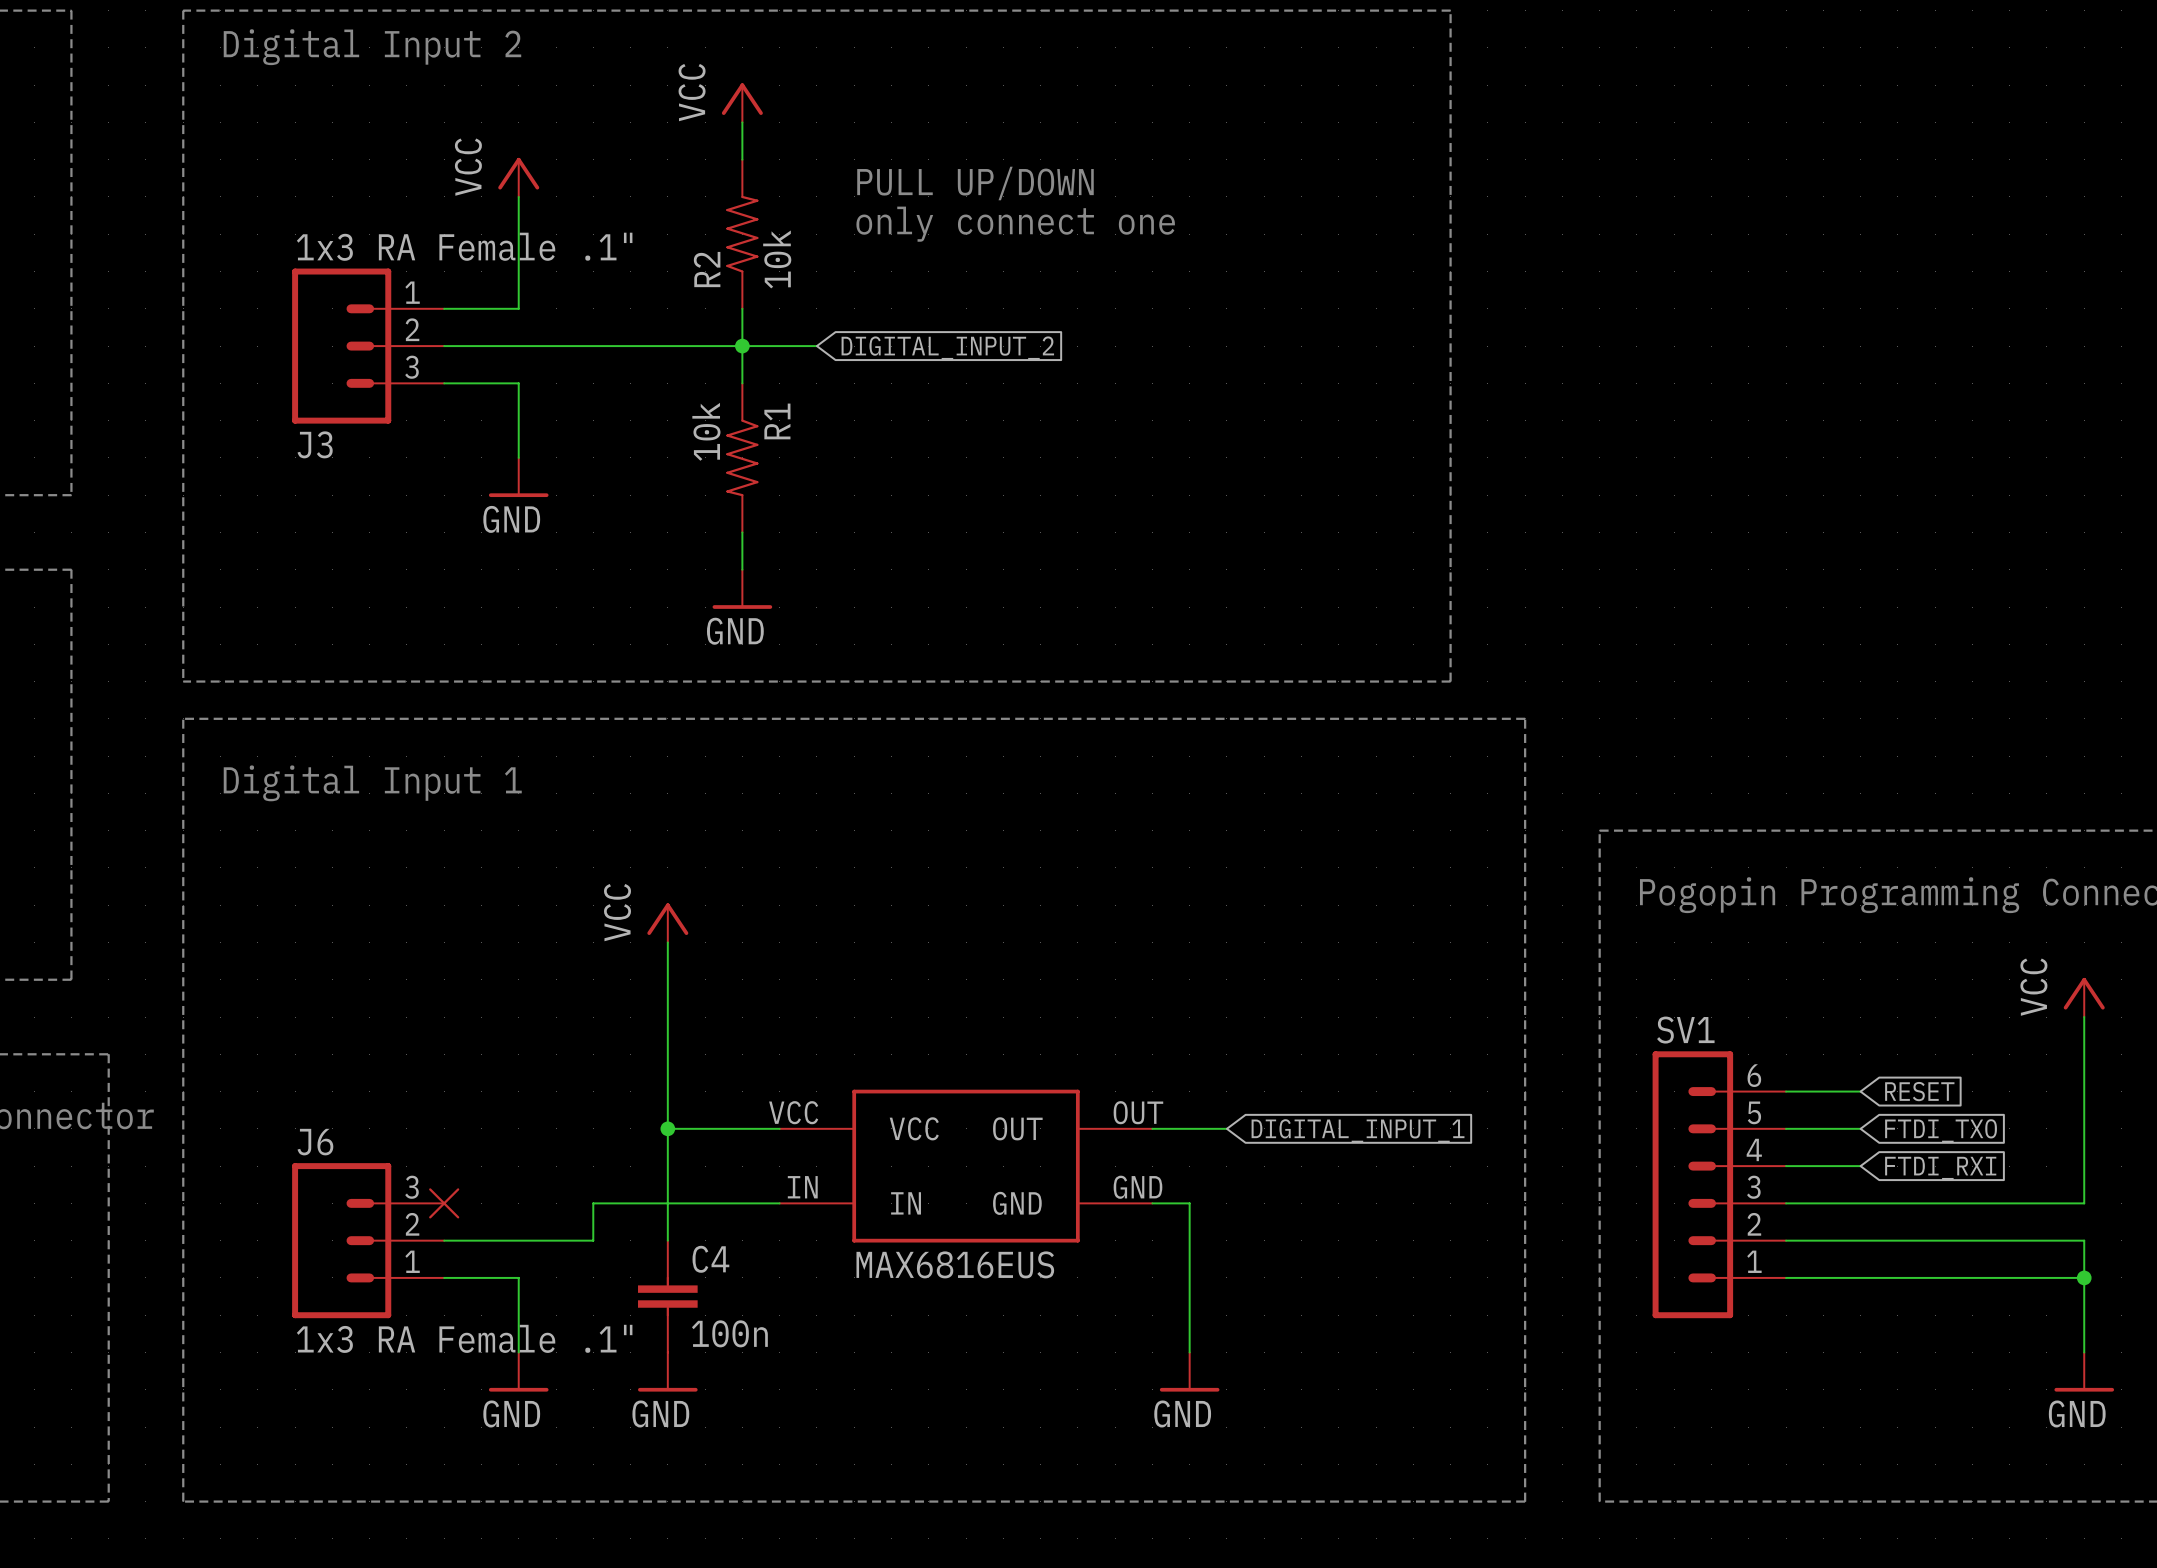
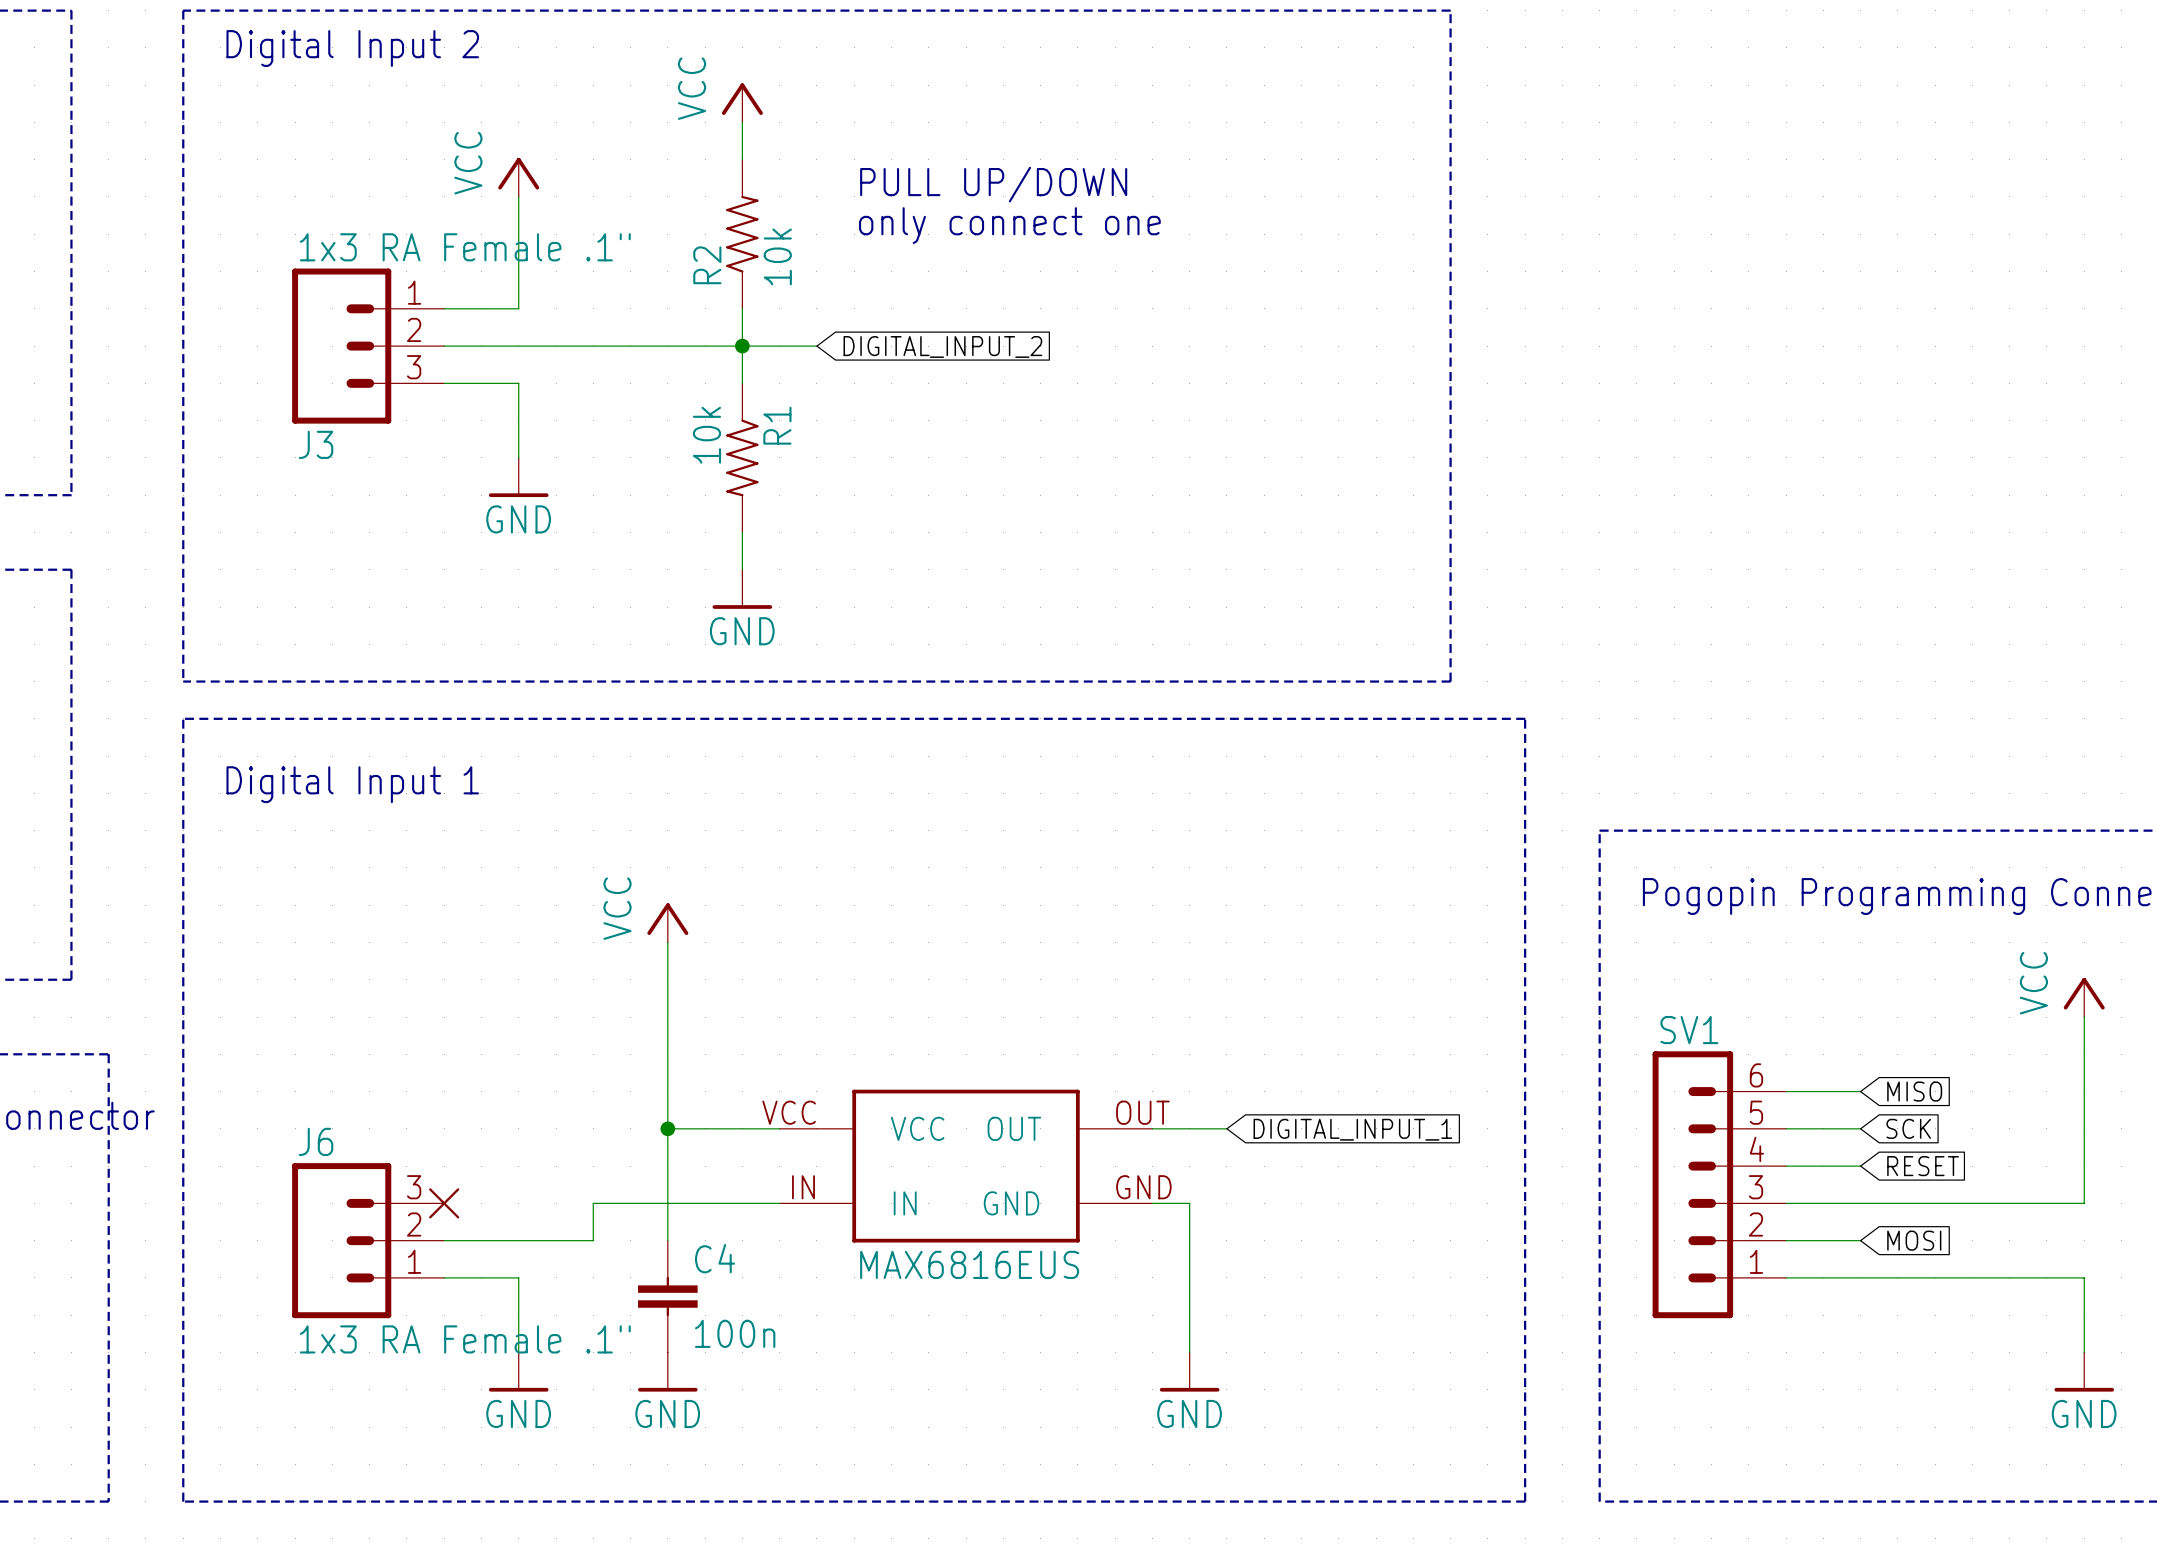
global label: RESET (1919, 1091) -> MISO (1914, 1091)
global label: FTDI_TXO (1941, 1130) -> SCK (1908, 1128)
global label: FTDI_RXI (1940, 1168) -> RESET (1923, 1166)
wire: (1860, 1240) (2084, 1240) (2084, 1277) -> none
global label: none -> MOSI (1914, 1240)
junction: (2084, 1277) -> none

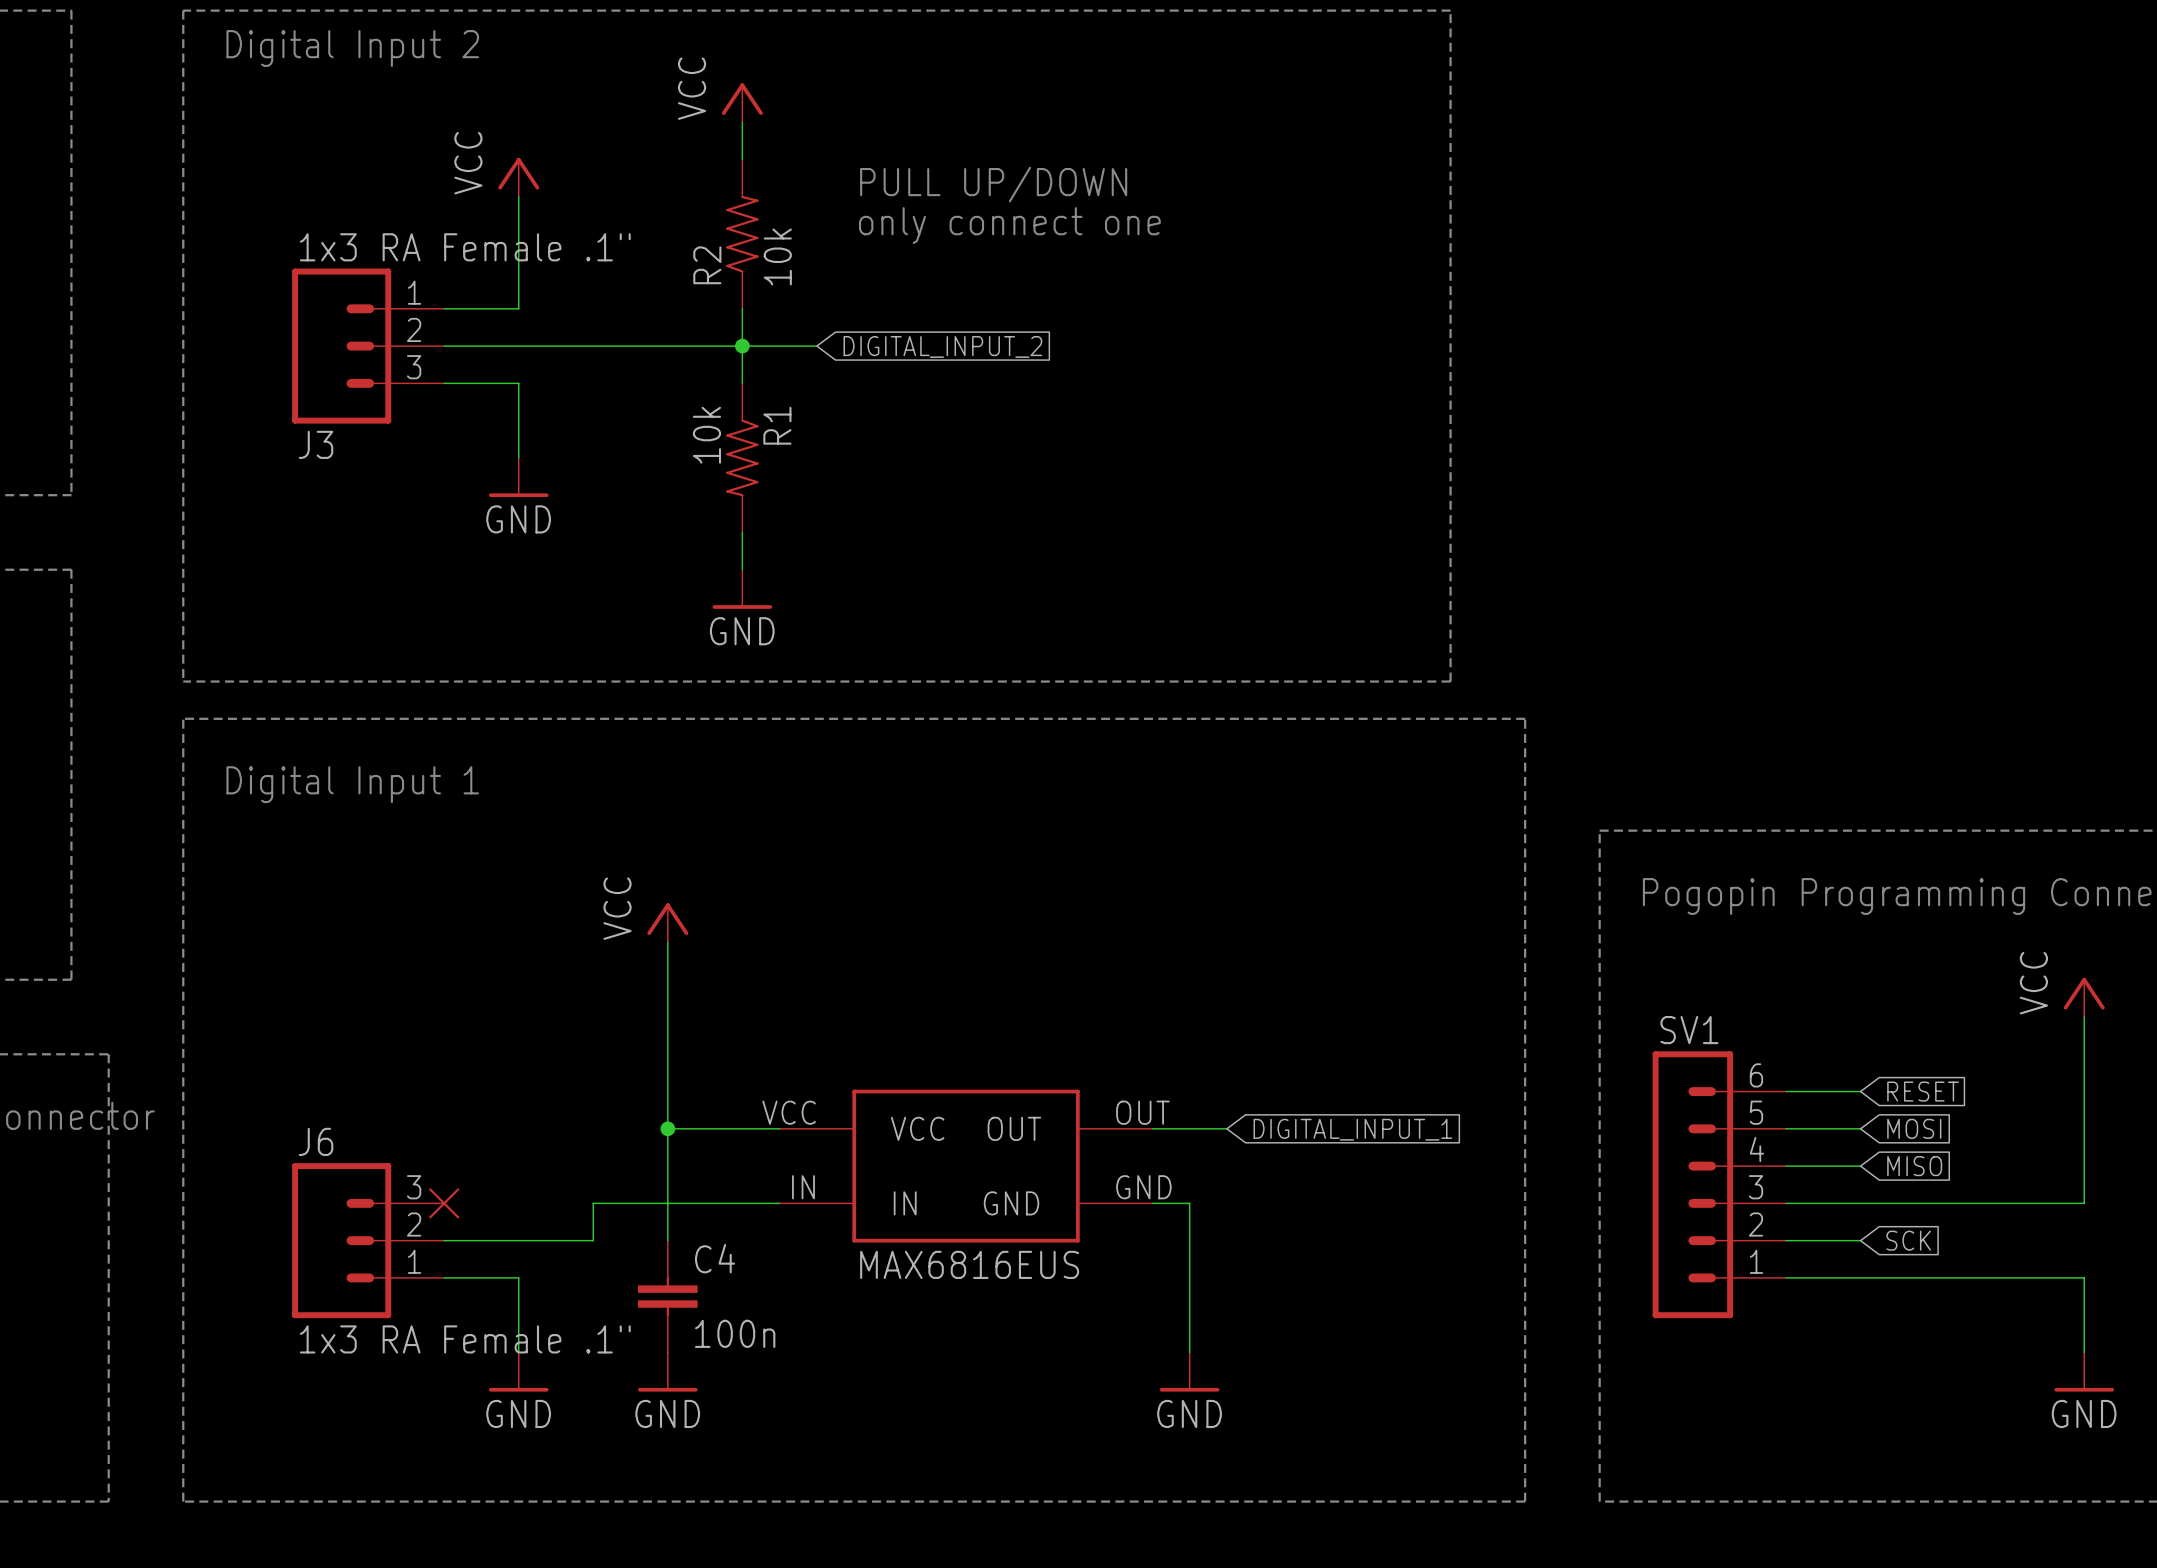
global label: MISO (1914, 1091) -> RESET (1923, 1091)
global label: SCK (1908, 1128) -> MOSI (1914, 1128)
global label: RESET (1923, 1166) -> MISO (1914, 1166)
global label: MOSI (1914, 1240) -> SCK (1908, 1240)

